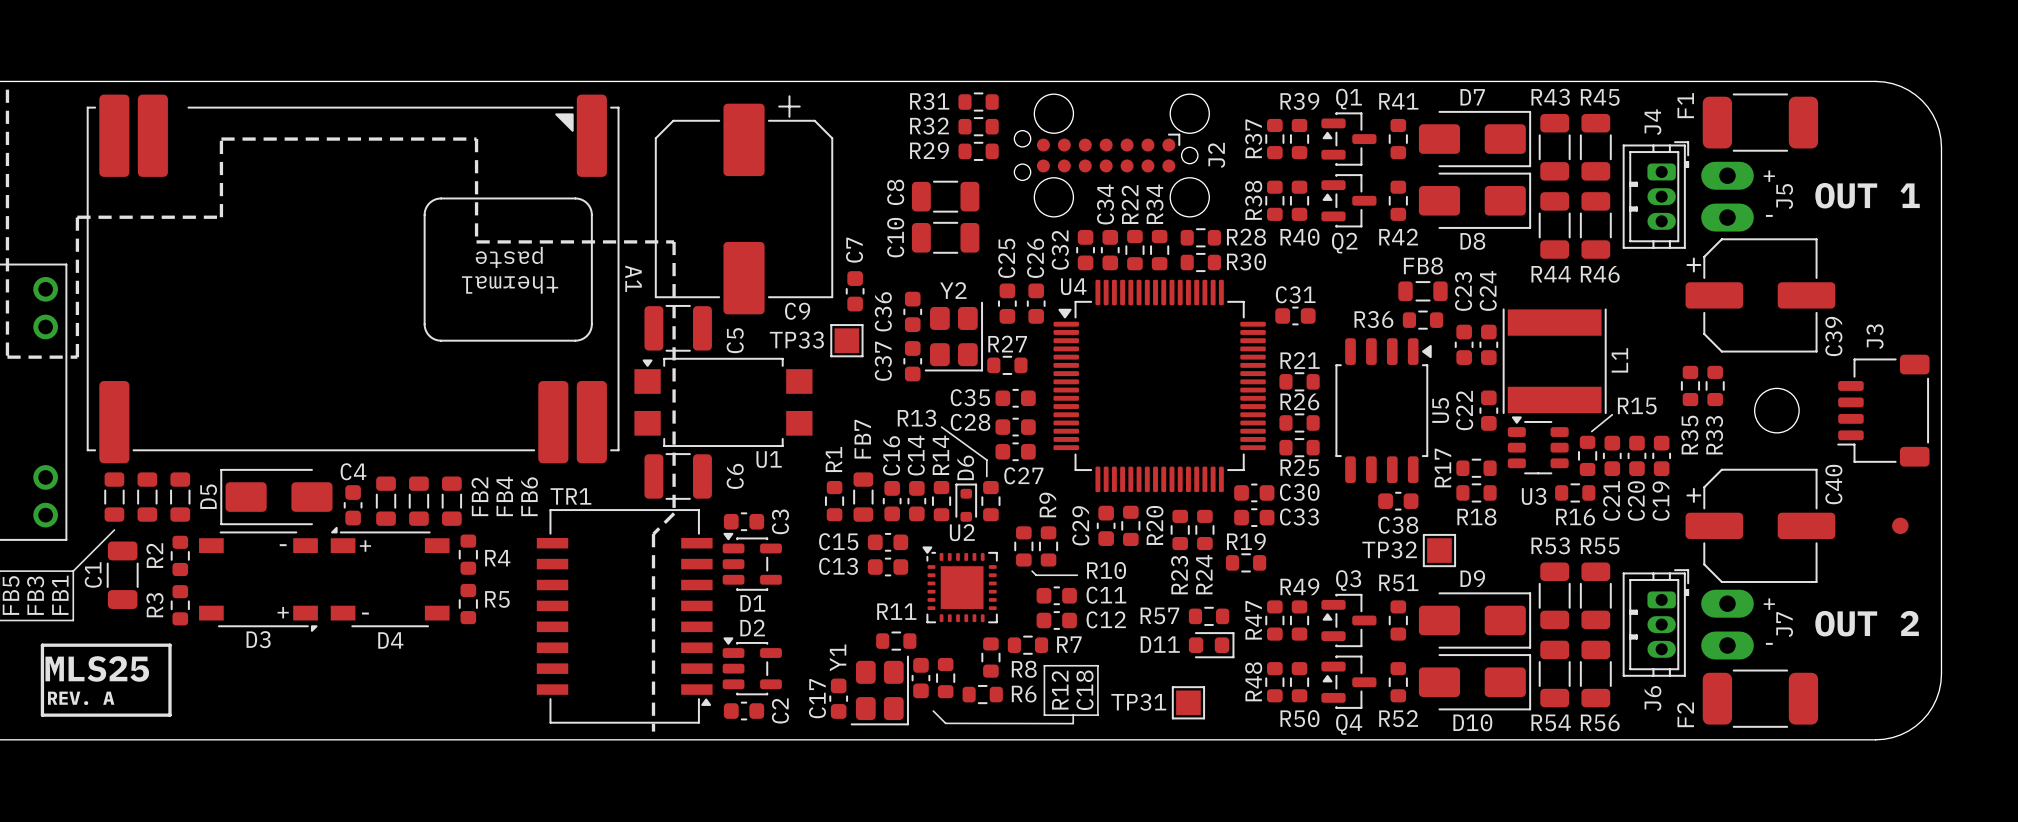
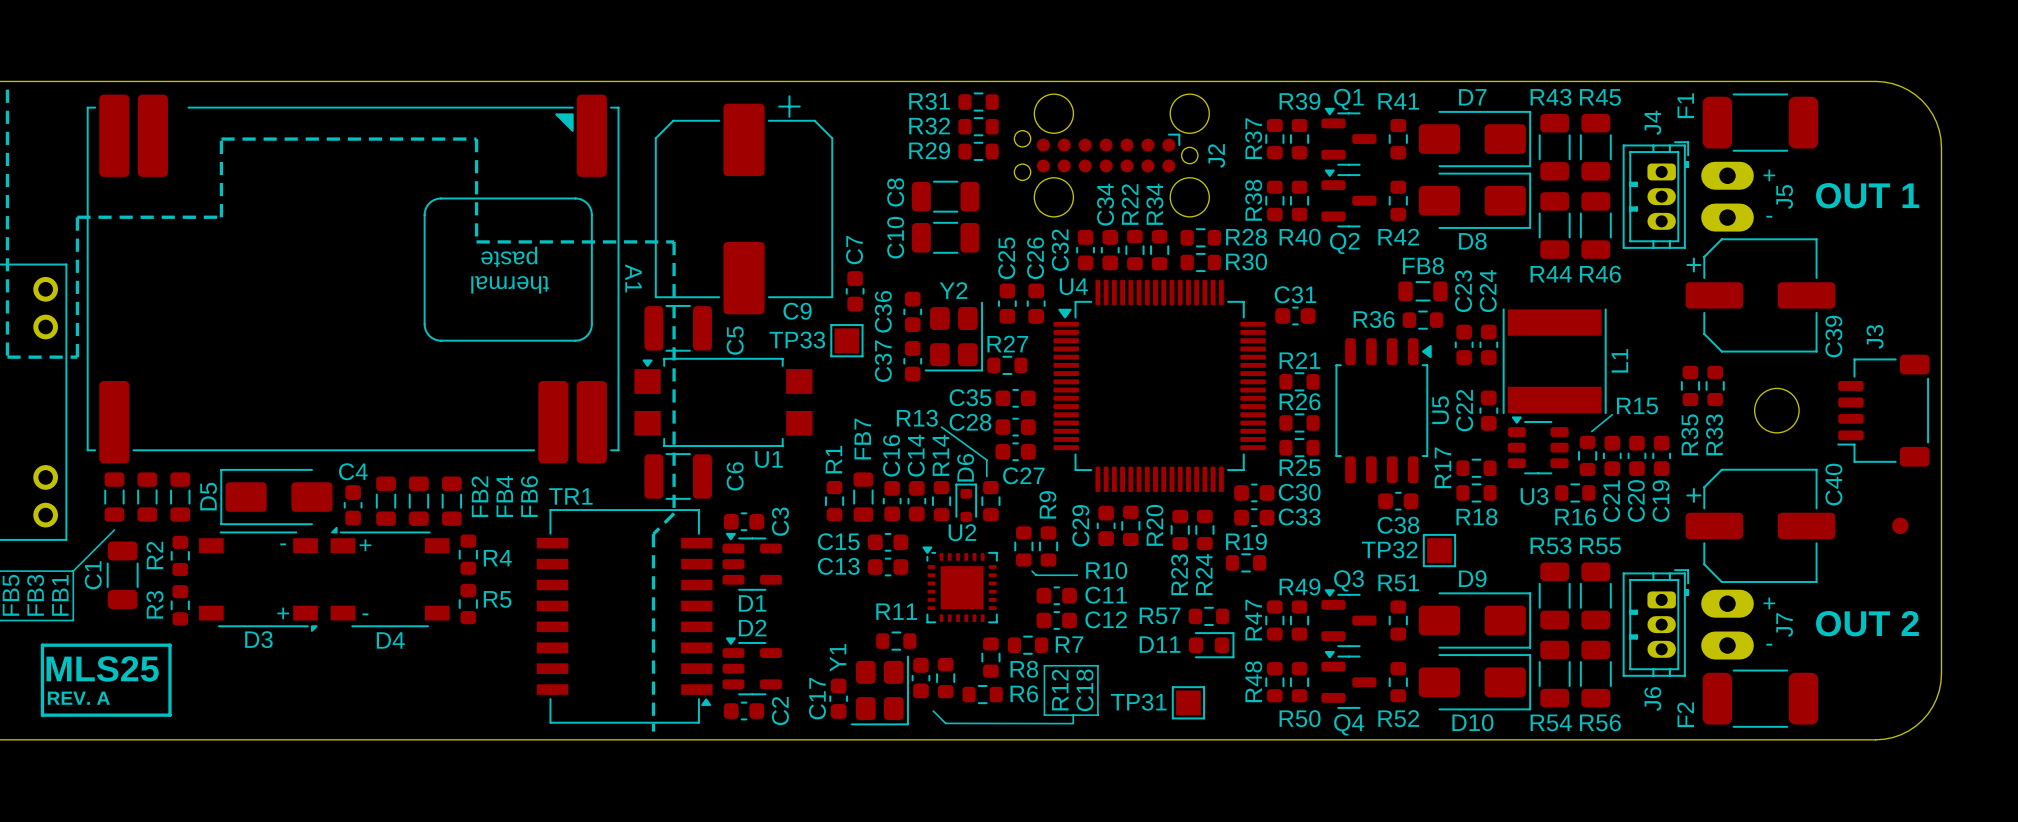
Q1 footprint: [1321, 112, 1377, 166] -> [1321, 107, 1377, 166]
Q2 footprint: [1321, 174, 1377, 228] -> [1321, 169, 1377, 228]
D1 footprint: [722, 532, 782, 591] -> [722, 532, 782, 591]
Q3 footprint: [1321, 593, 1377, 648] -> [1321, 589, 1377, 648]
D2 footprint: [722, 637, 782, 696] -> [722, 637, 782, 696]
Q4 footprint: [1321, 655, 1377, 709] -> [1321, 650, 1377, 709]

